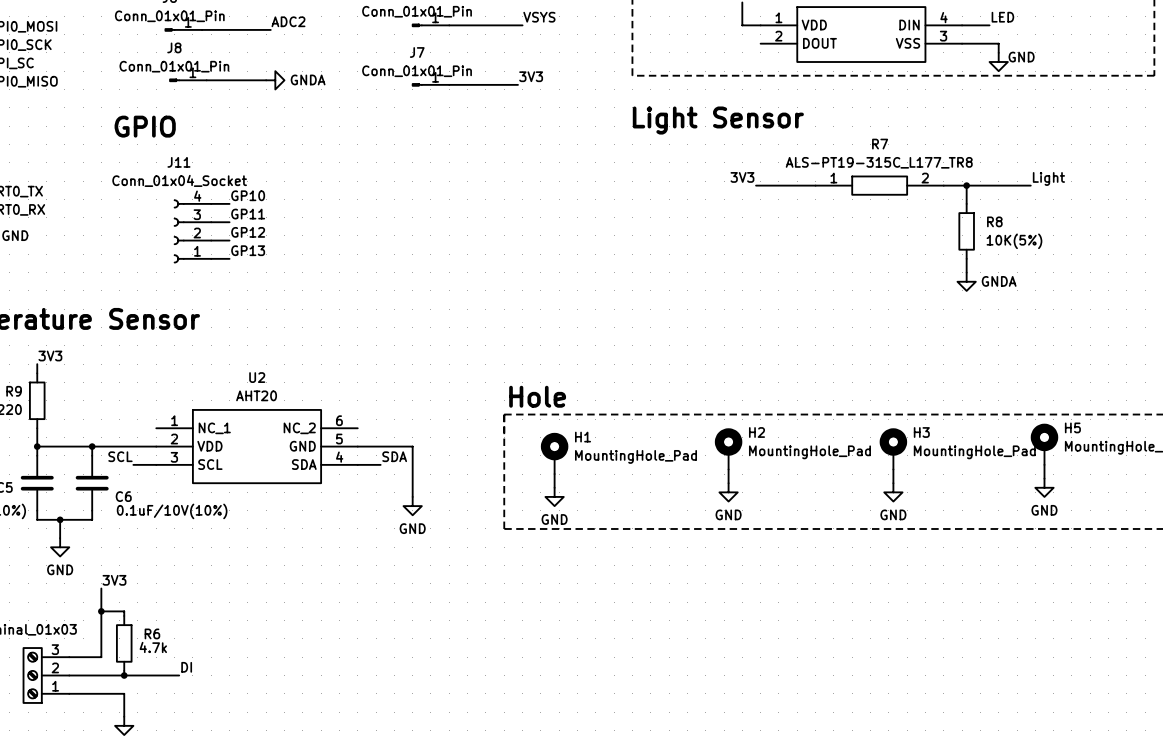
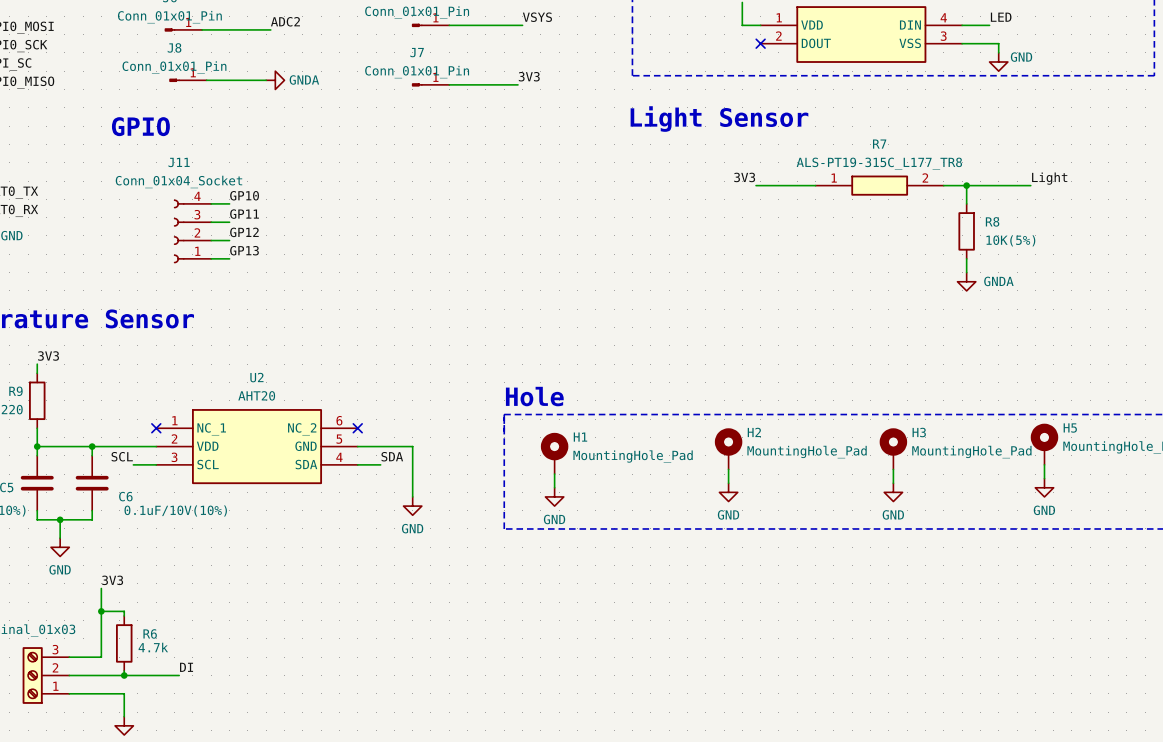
no-connect mark: none -> (760, 43)
no-connect mark: none -> (156, 428)
no-connect mark: none -> (357, 428)

